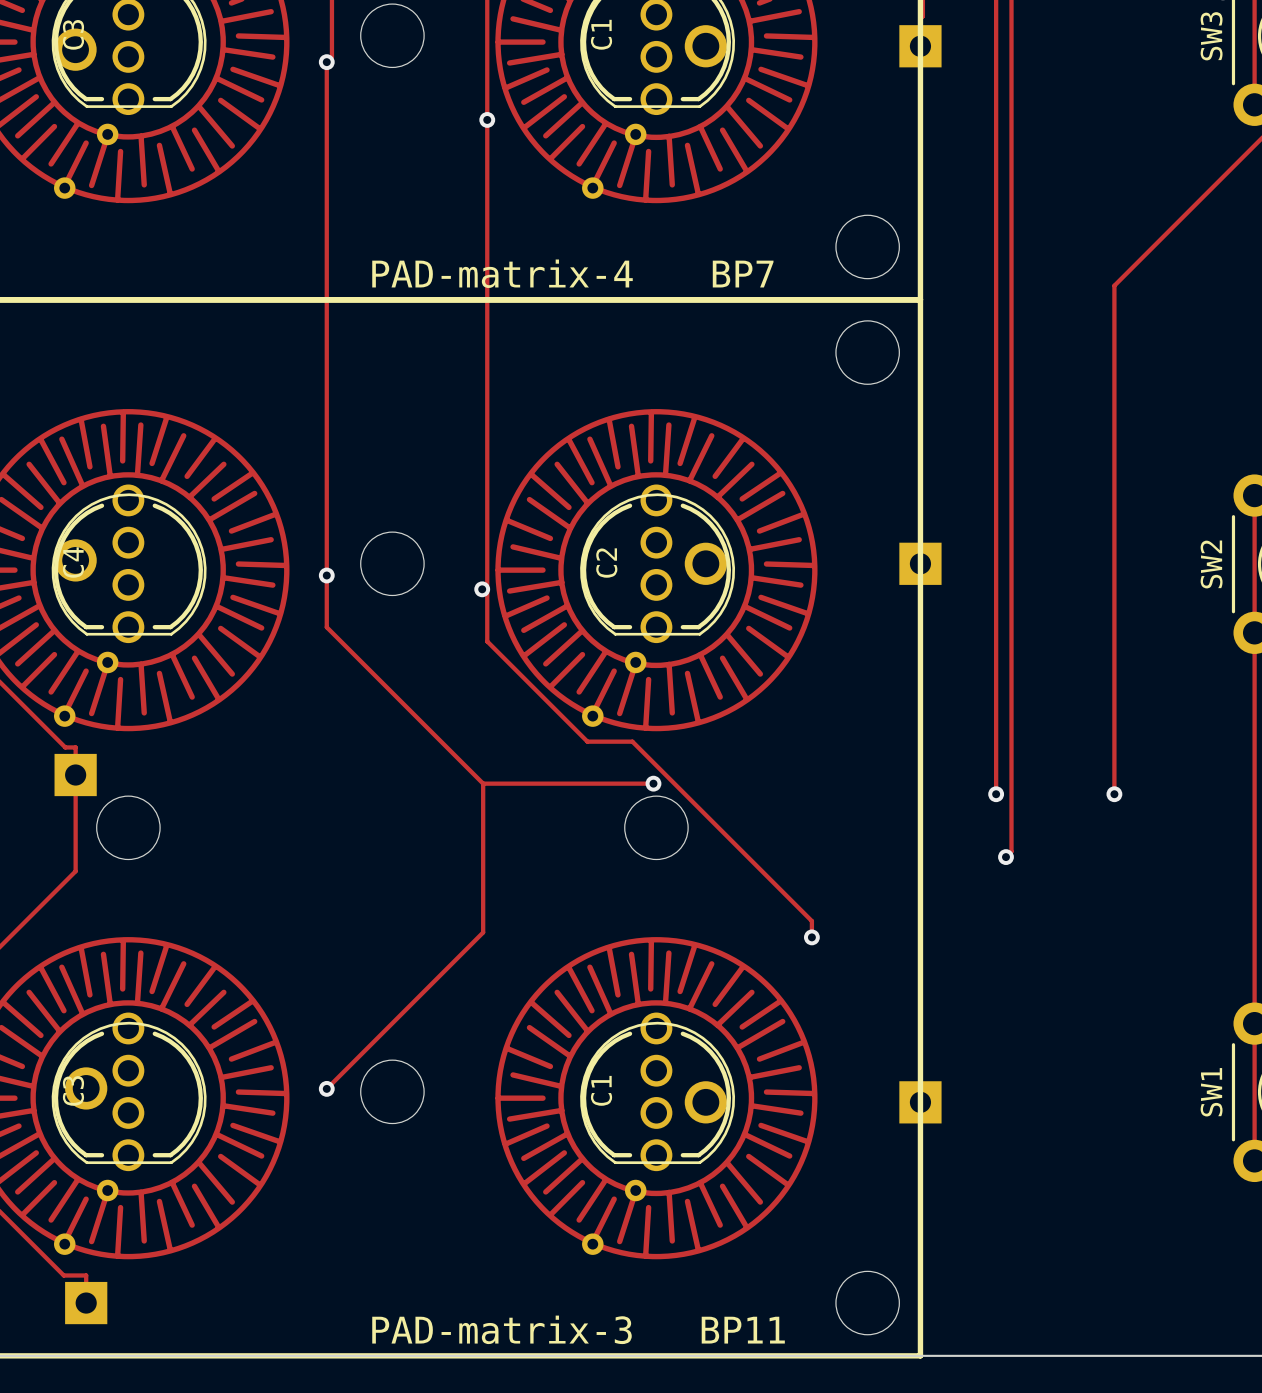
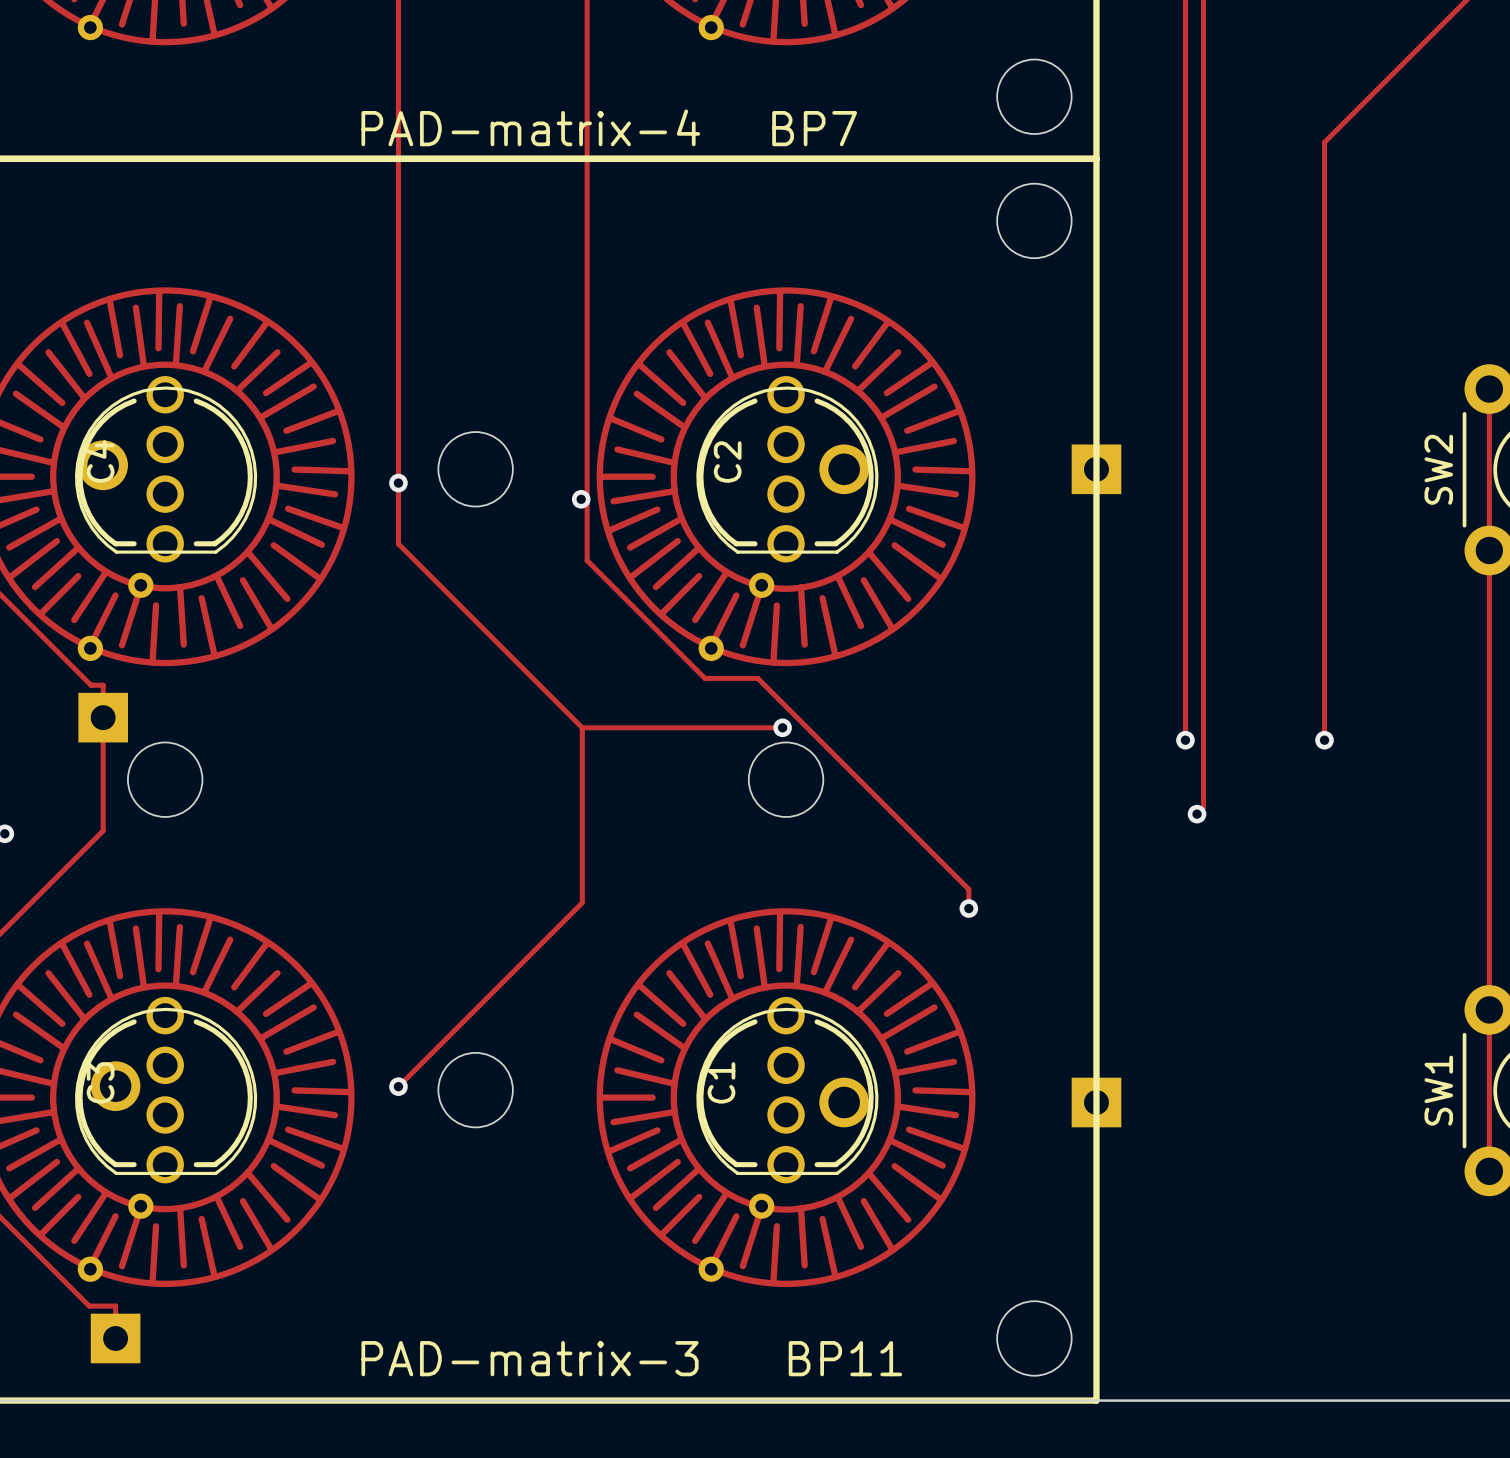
PAD-matrix-4 name position: PAD-matrix-4 (502, 273) -> PAD-matrix-4 (530, 127)
PAD-matrix-4 value position: BP7 (743, 274) -> BP7 (814, 128)
PAD-matrix-3 name position: PAD-matrix-3 (502, 1329) -> PAD-matrix-3 (530, 1358)
PAD-matrix-3 value position: BP11 (743, 1330) -> BP11 (845, 1358)

